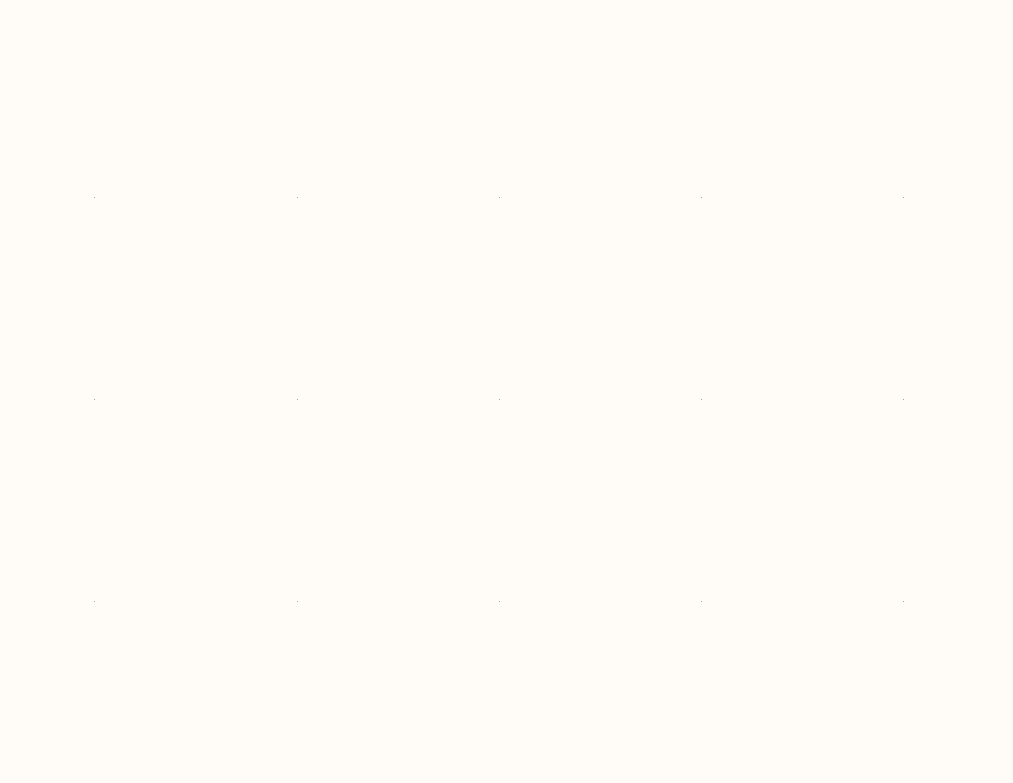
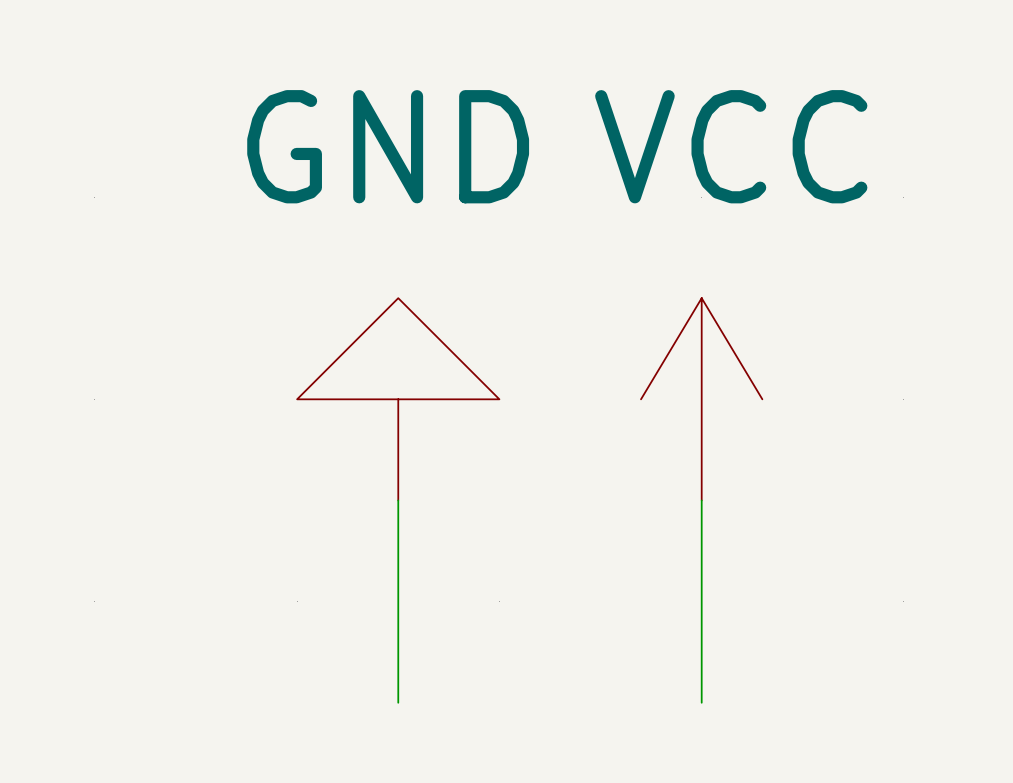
power symbol: none -> GND (398, 399)
power symbol: none -> VCC (701, 399)
wire: none -> (398, 500) (398, 702)
wire: none -> (701, 500) (701, 702)

